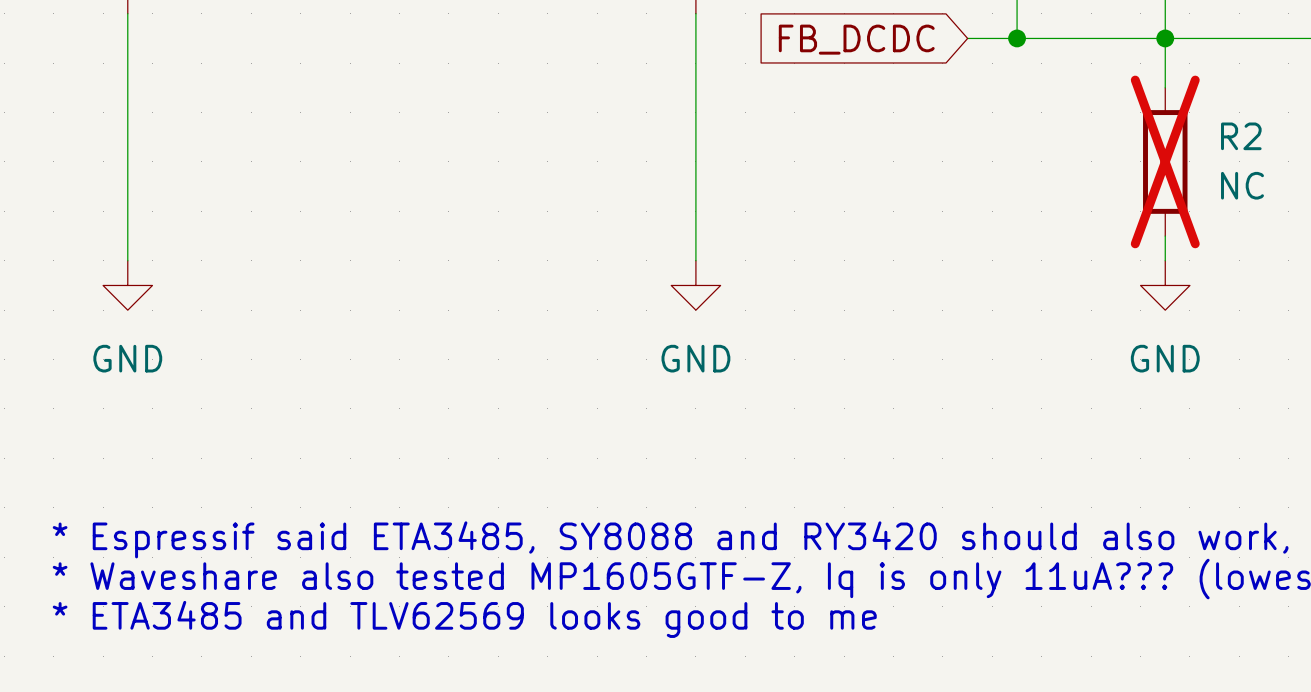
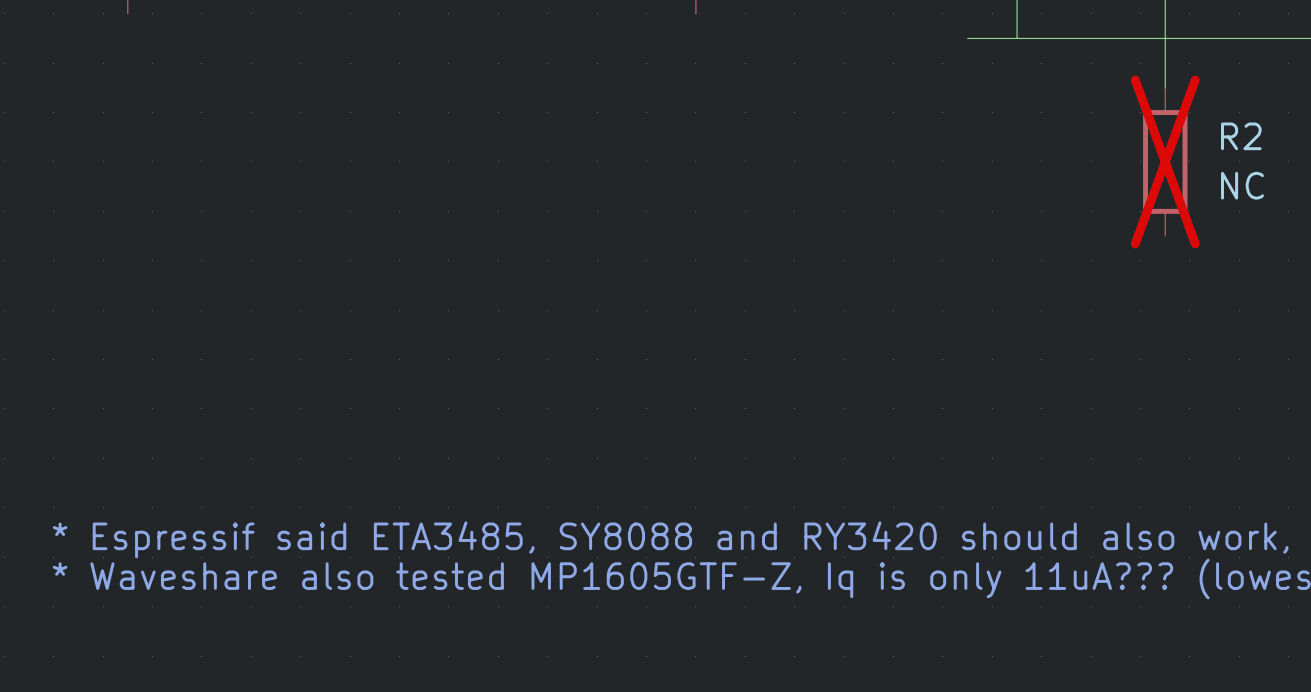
wire: (127, 13) (127, 260) -> none
wire: (695, 13) (695, 260) -> none
junction: (1017, 38) -> none
junction: (1165, 38) -> none
global label: FB_DCDC (856, 39) -> none
wire: (1165, 236) (1165, 260) -> none
power symbol: GND (127, 285) -> none
power symbol: GND (695, 285) -> none
power symbol: GND (1165, 285) -> none
text: * ETA3485 and TLV62569 looks good to me (464, 619) -> none

